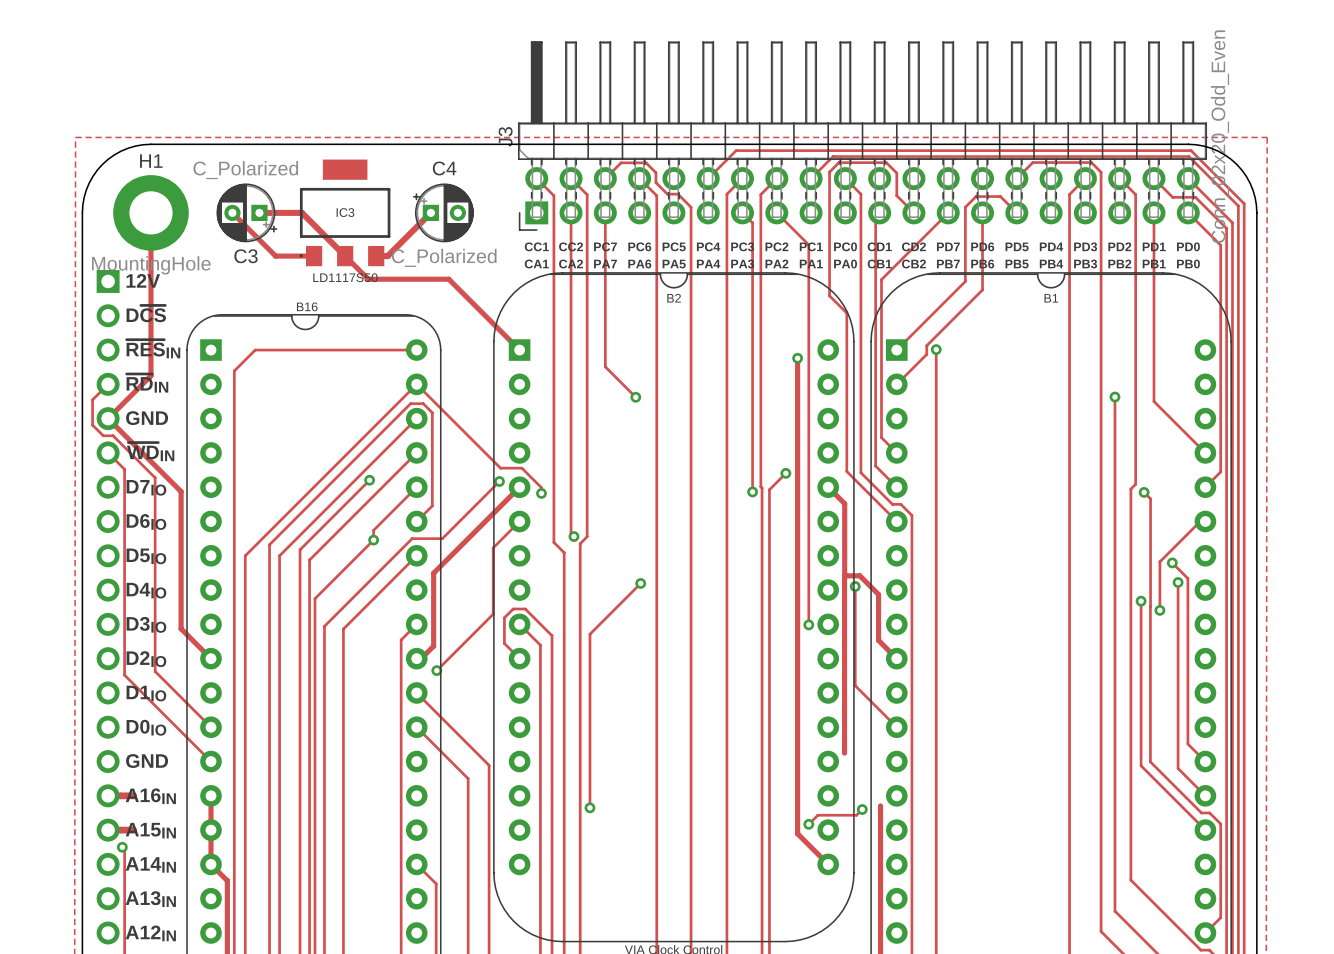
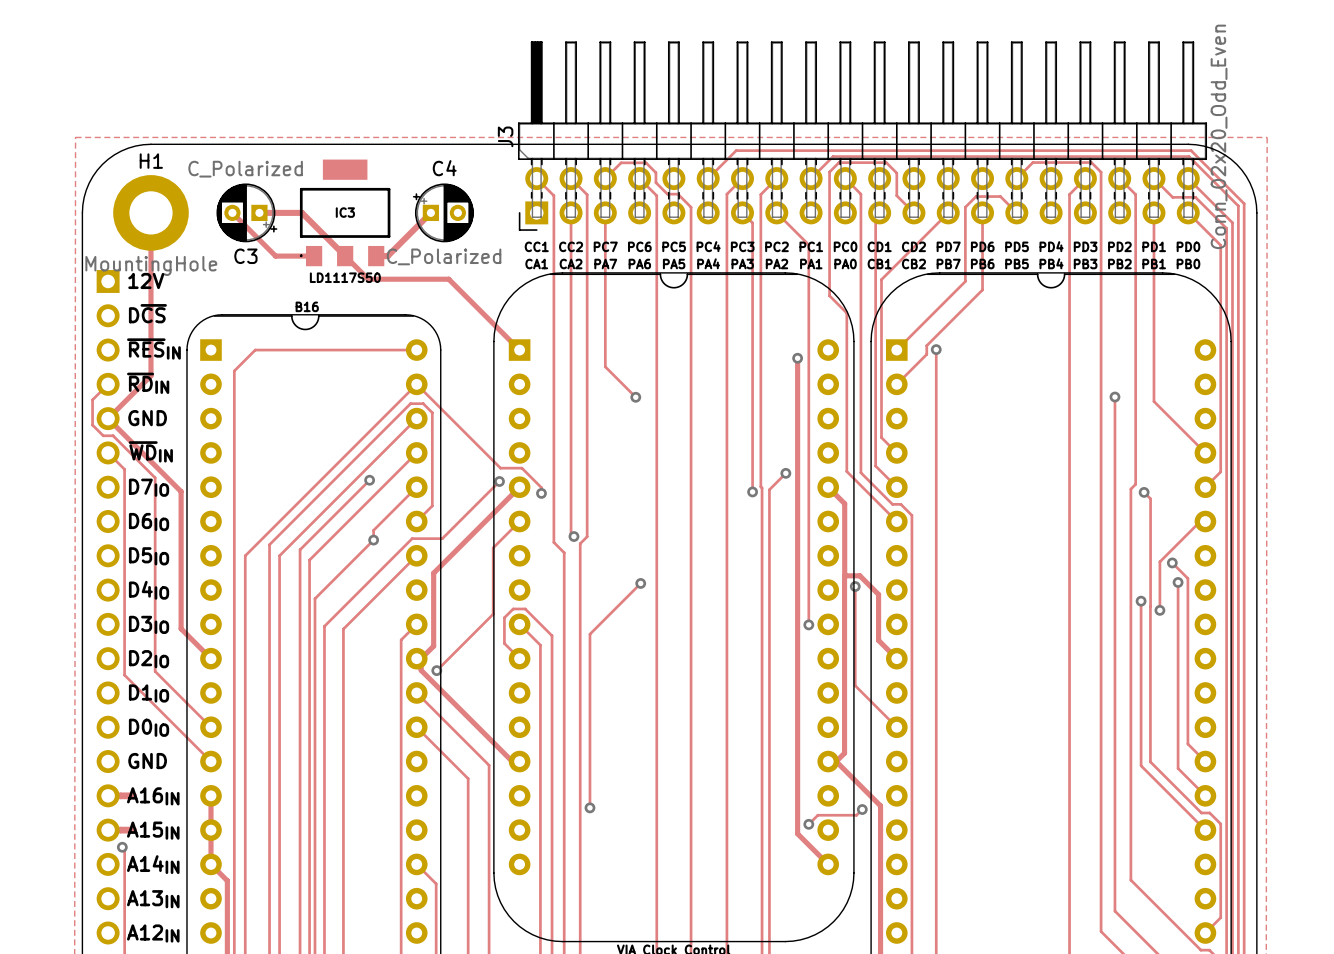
B2 name: B2 (674, 298) -> none
B1 name: B1 (1051, 298) -> none
track: none -> (421, 658) (421, 670) (512, 761)
track: none -> (844, 753) (836, 761) (880, 805)

